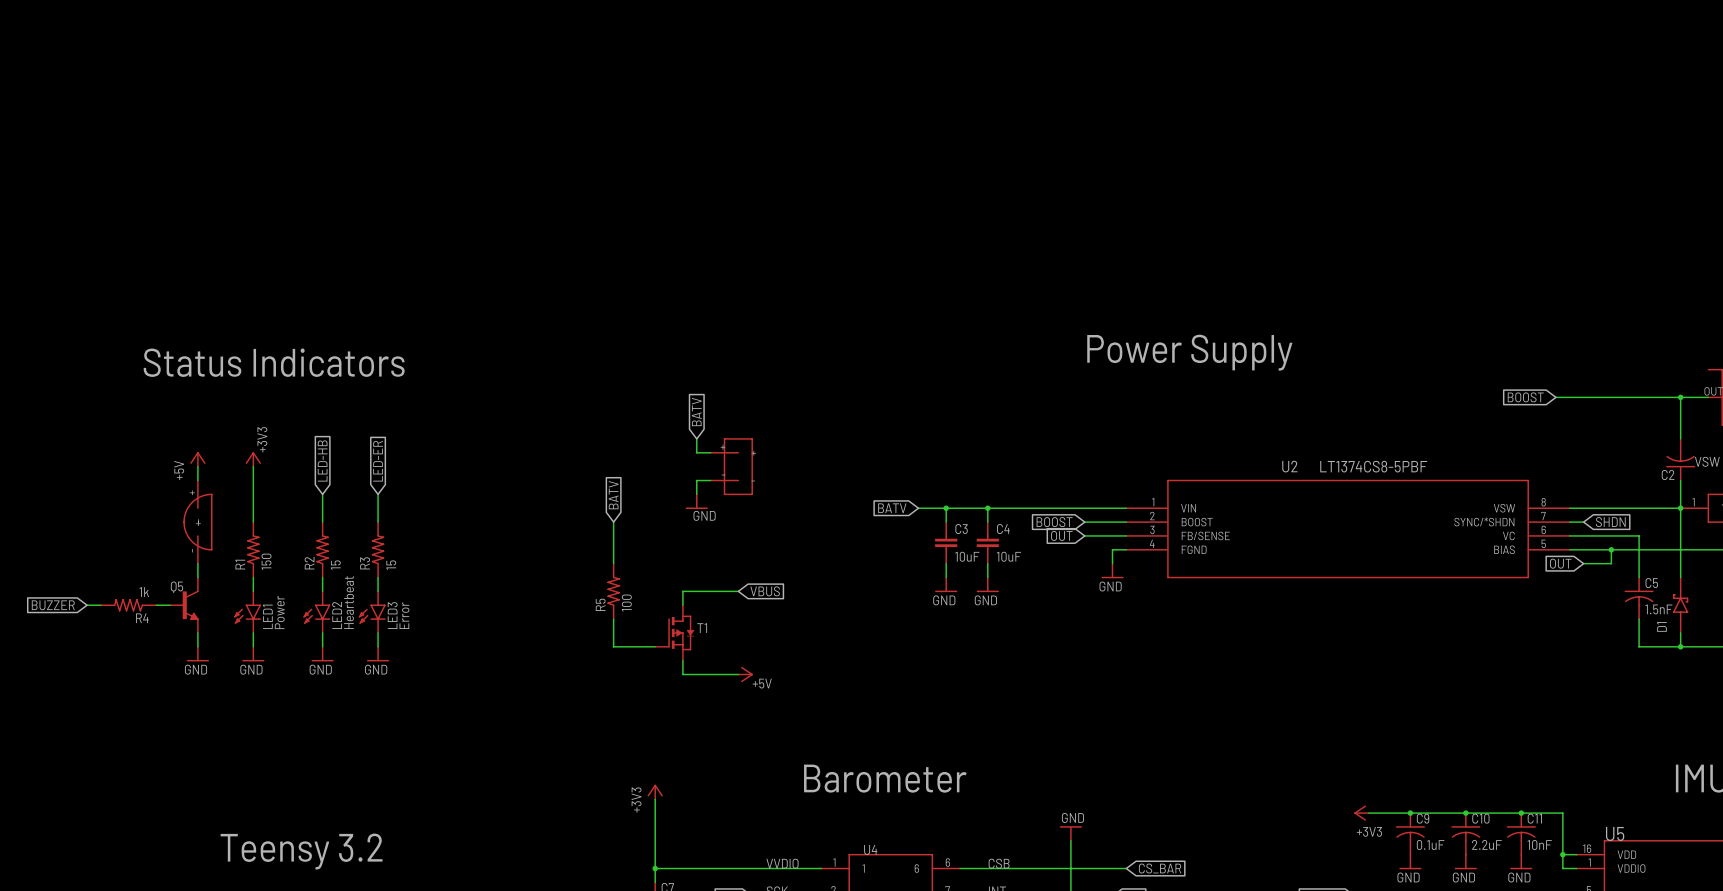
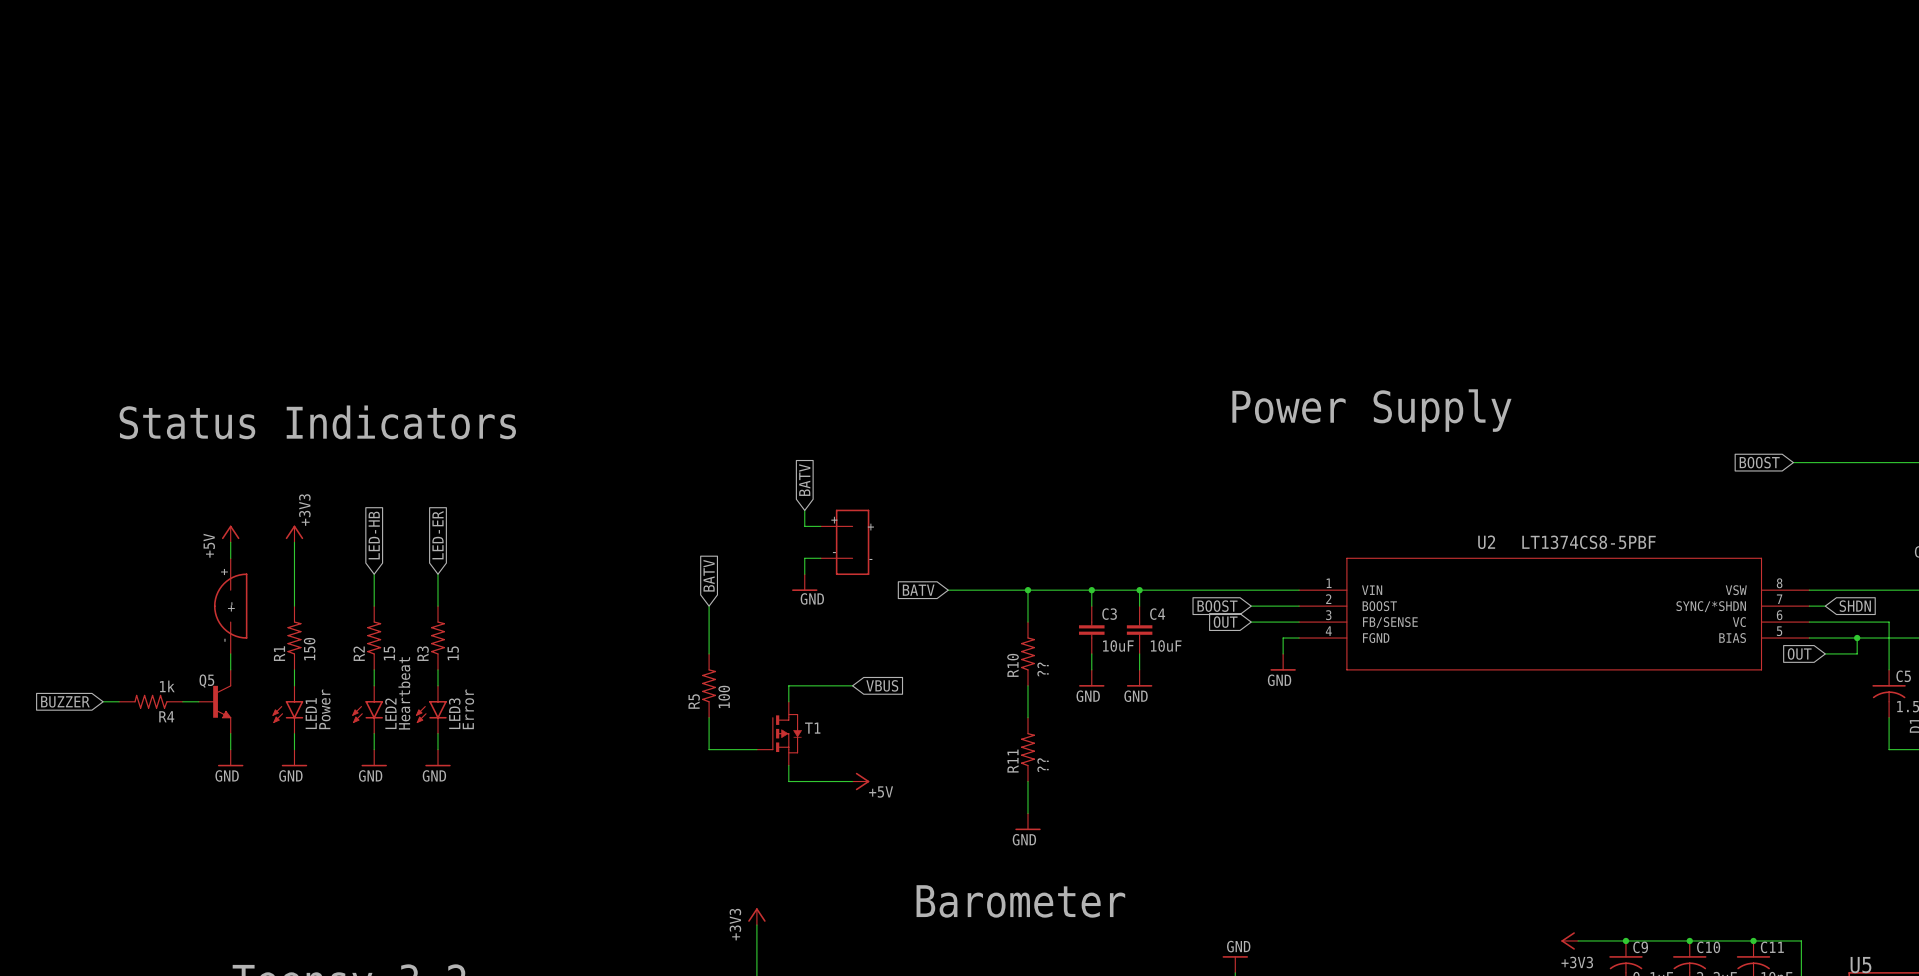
wire: none -> (948, 590) (1059, 590)
wire: none -> (1027, 590) (1027, 622)
junction: none -> (1027, 590)
global label position: BATV (892, 508) -> BATV (918, 590)
R10: none -> ?? (1027, 653)
wire: none -> (1027, 685) (1027, 717)
R11: none -> ?? (1027, 749)
wire: none -> (1027, 781) (1027, 813)
power symbol: none -> GND (1027, 821)

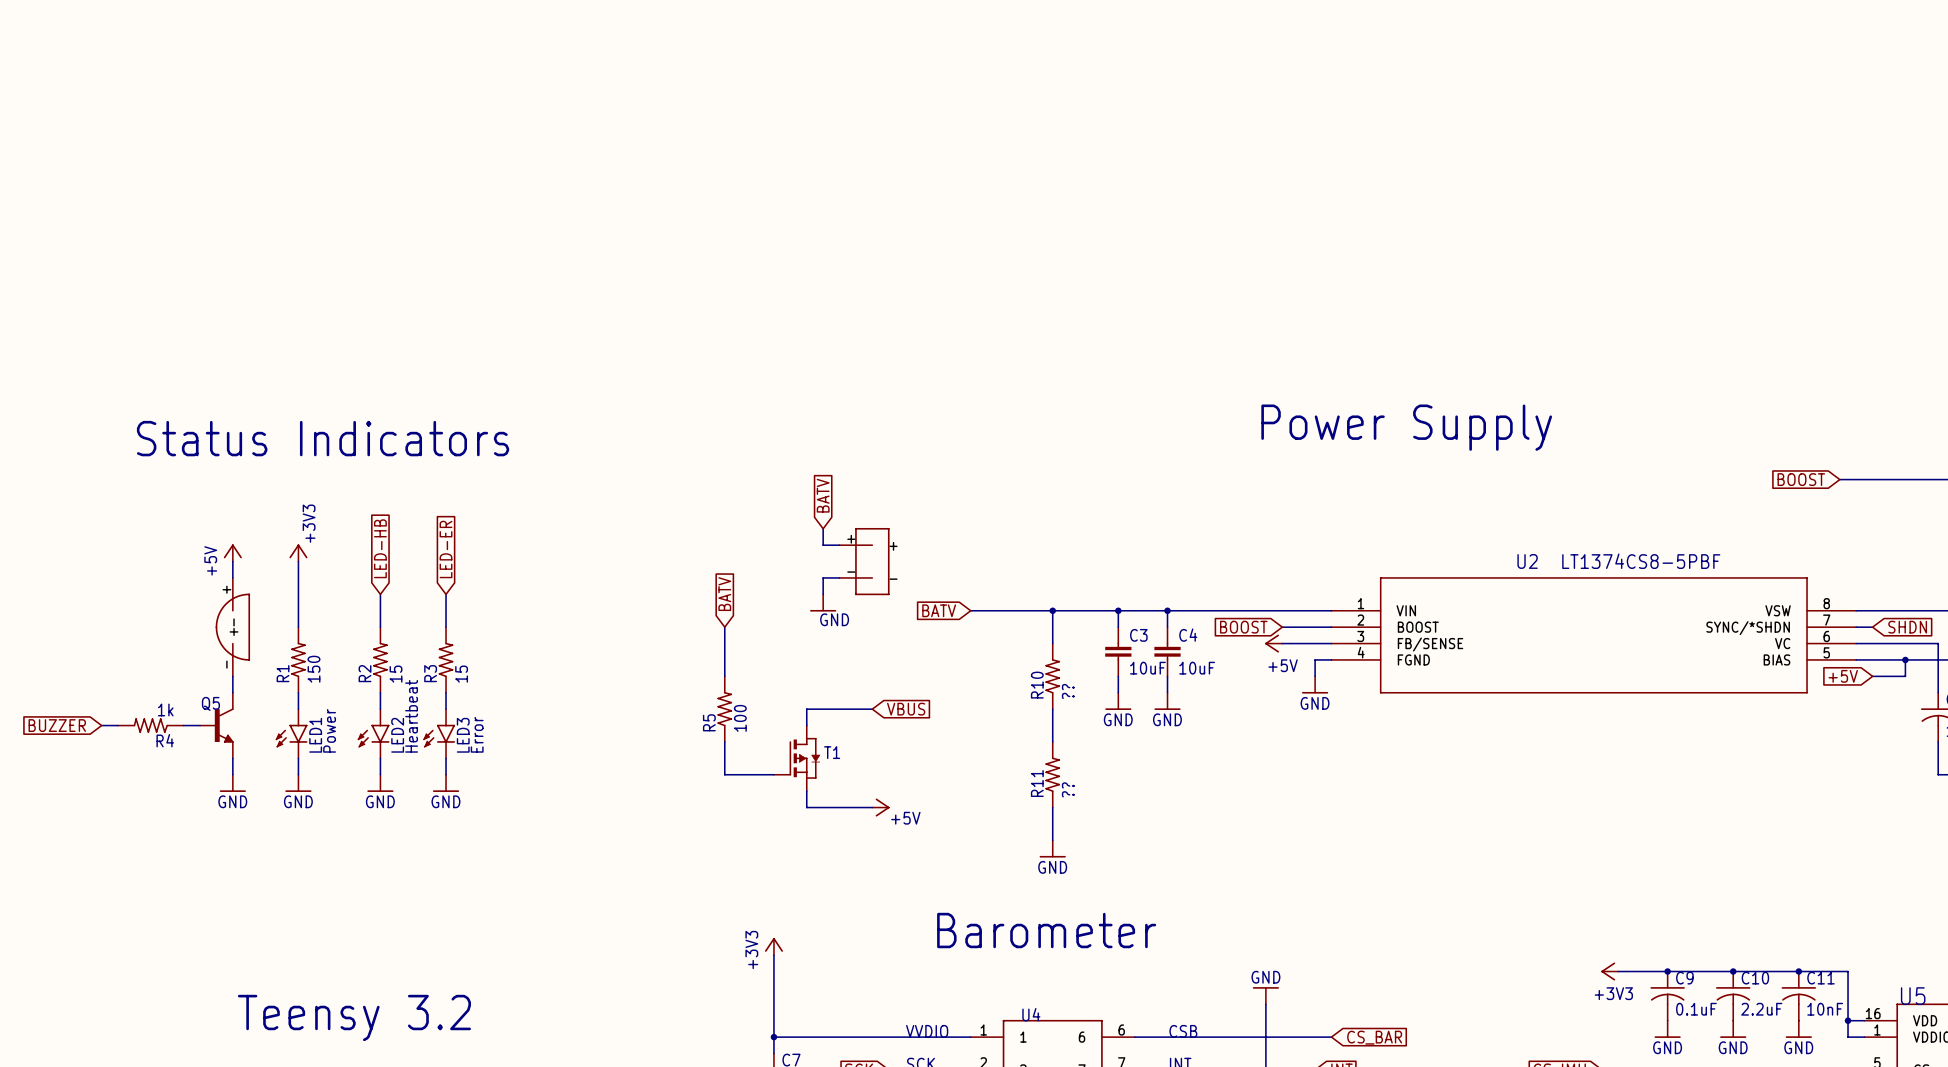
global label: OUT (1225, 622) -> none
power symbol: none -> +5V (1273, 643)
global label: OUT (1799, 653) -> +5V (1843, 676)

